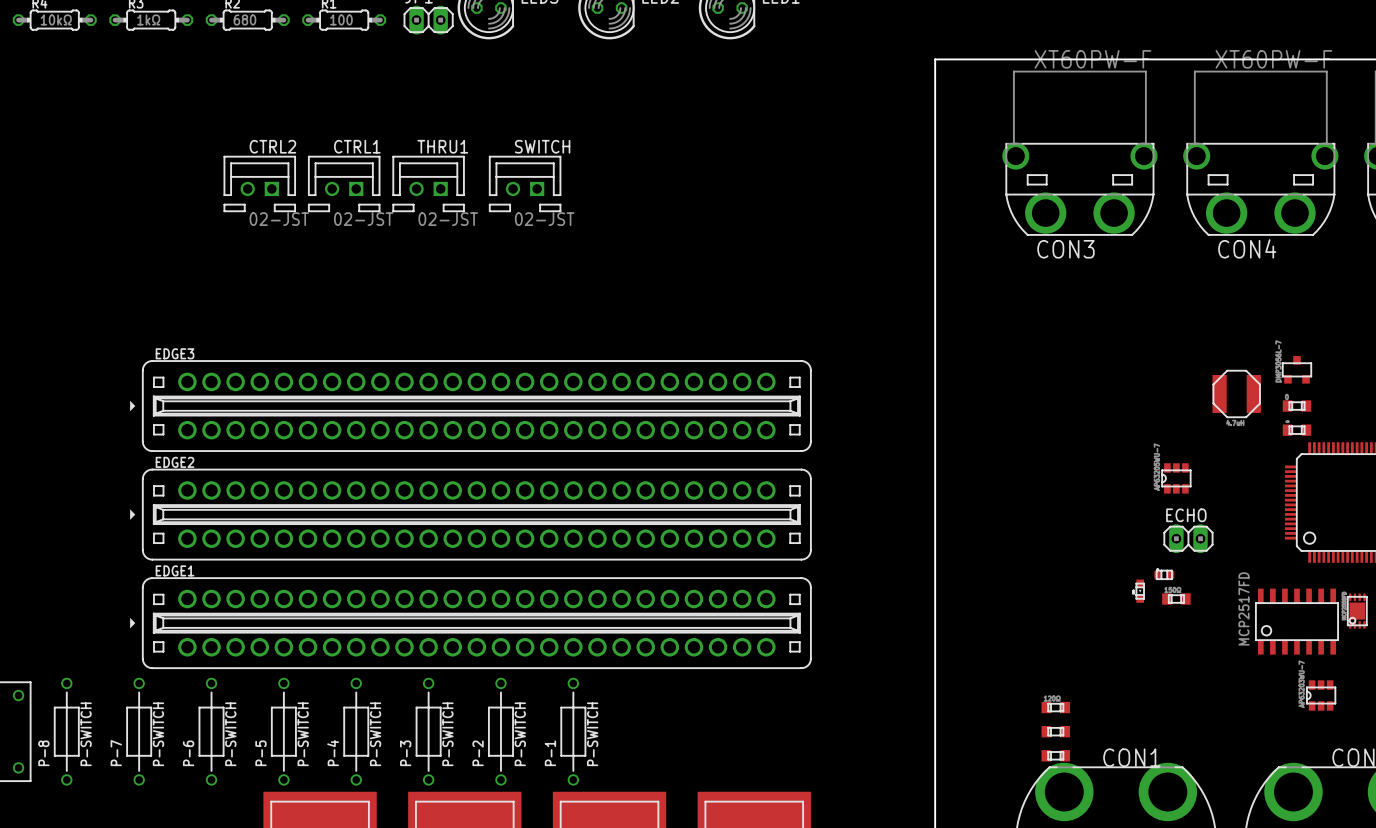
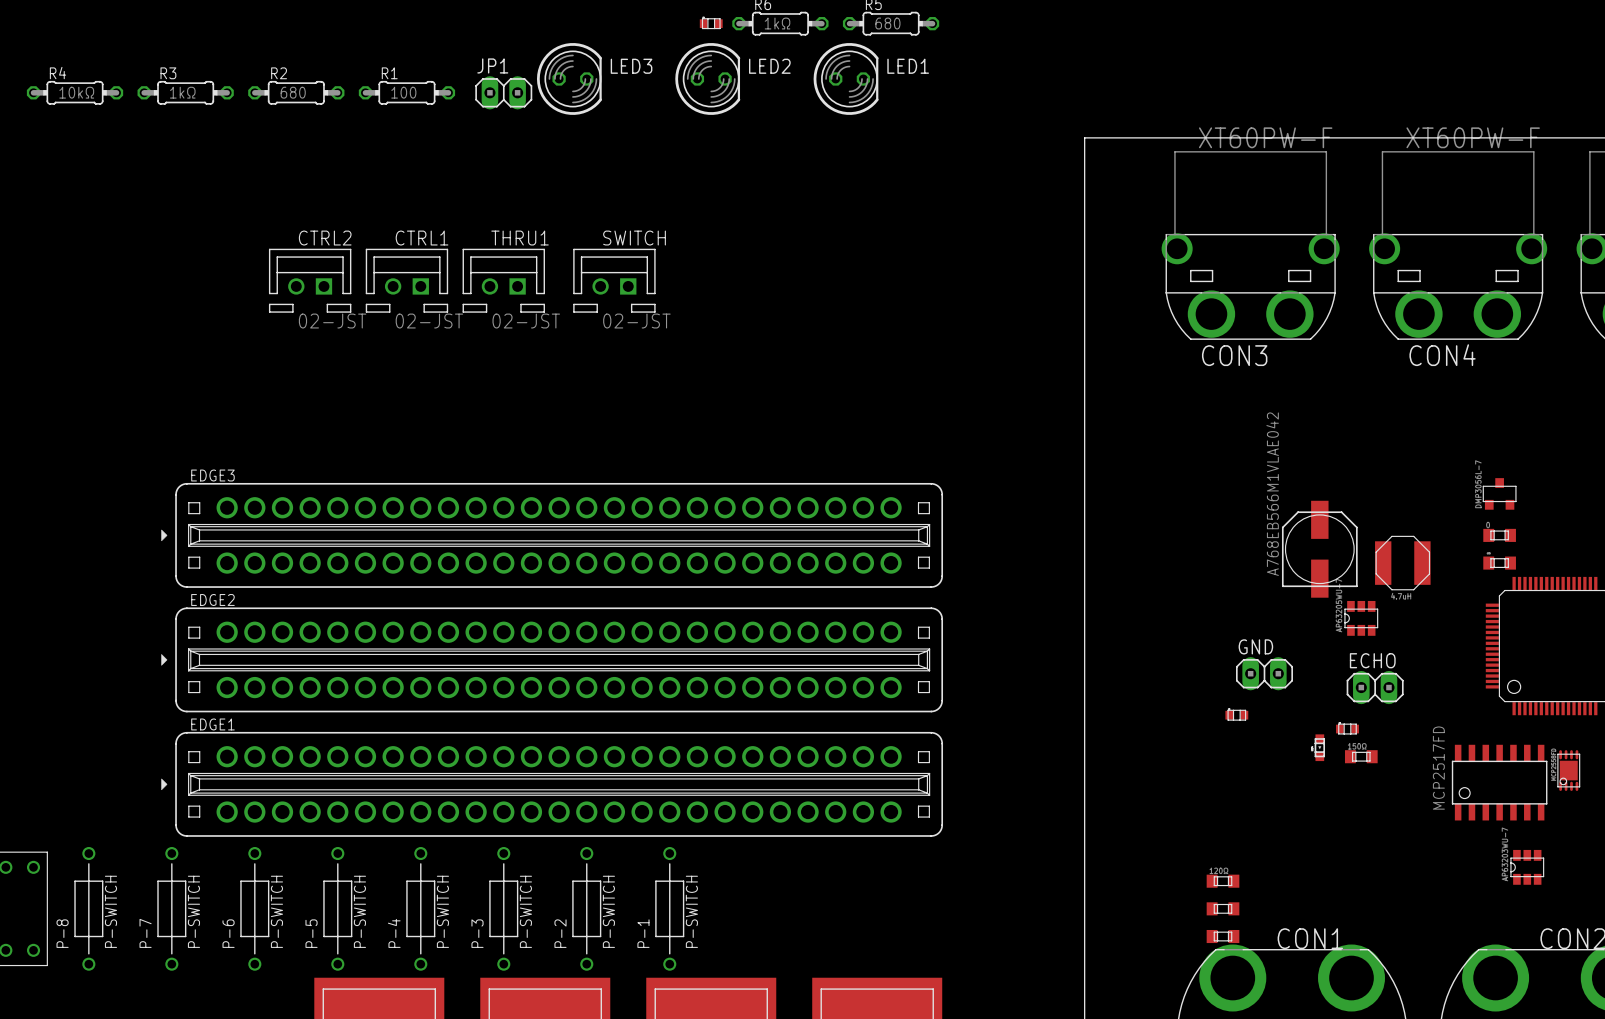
part position: (1236, 393) -> (1402, 563)
part: none -> A768EB566M1VLAE042 (1319, 549)
GND: none -> (1264, 673)
part: none -> (1236, 715)

